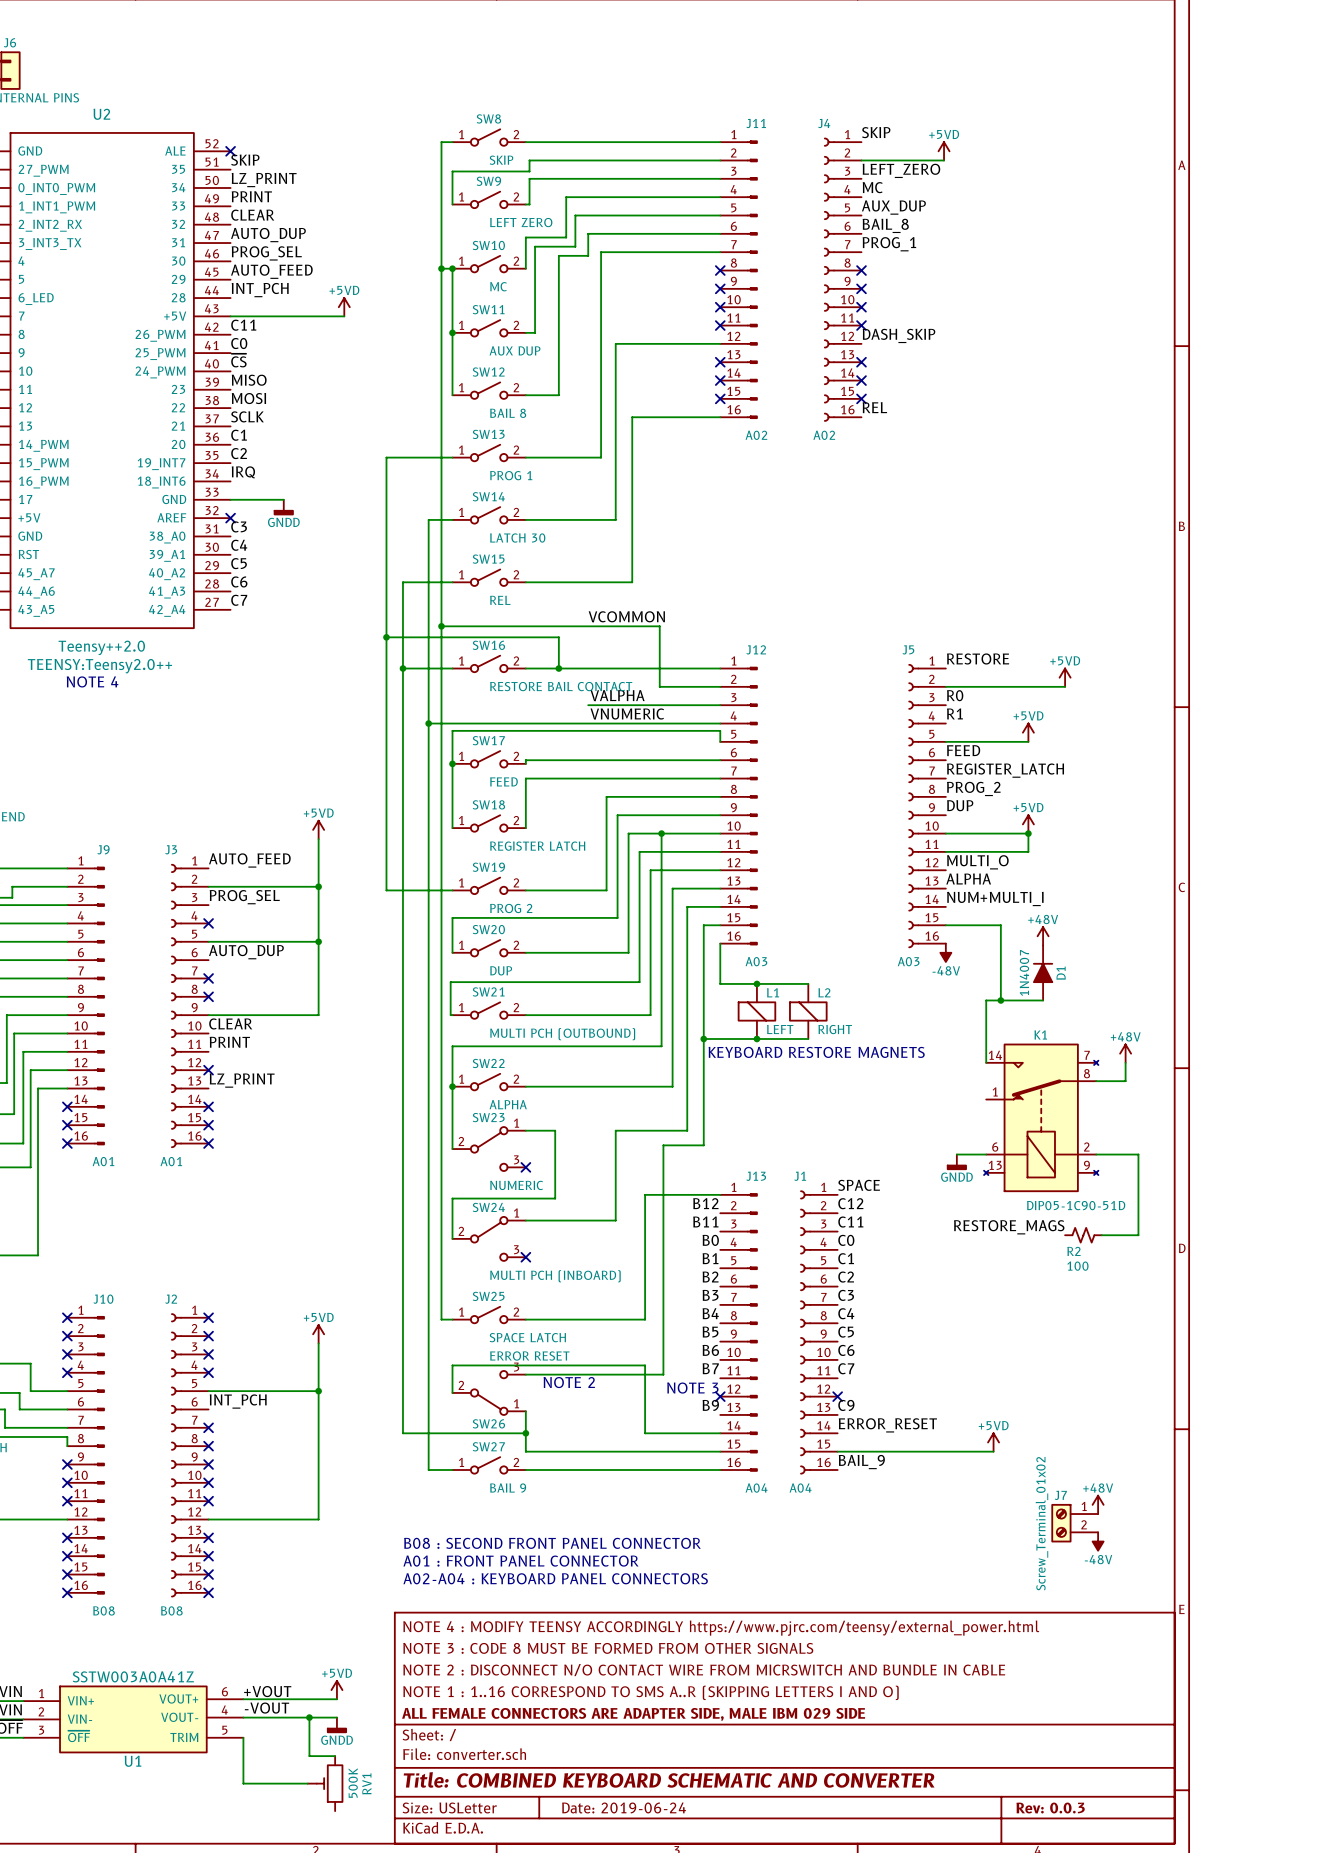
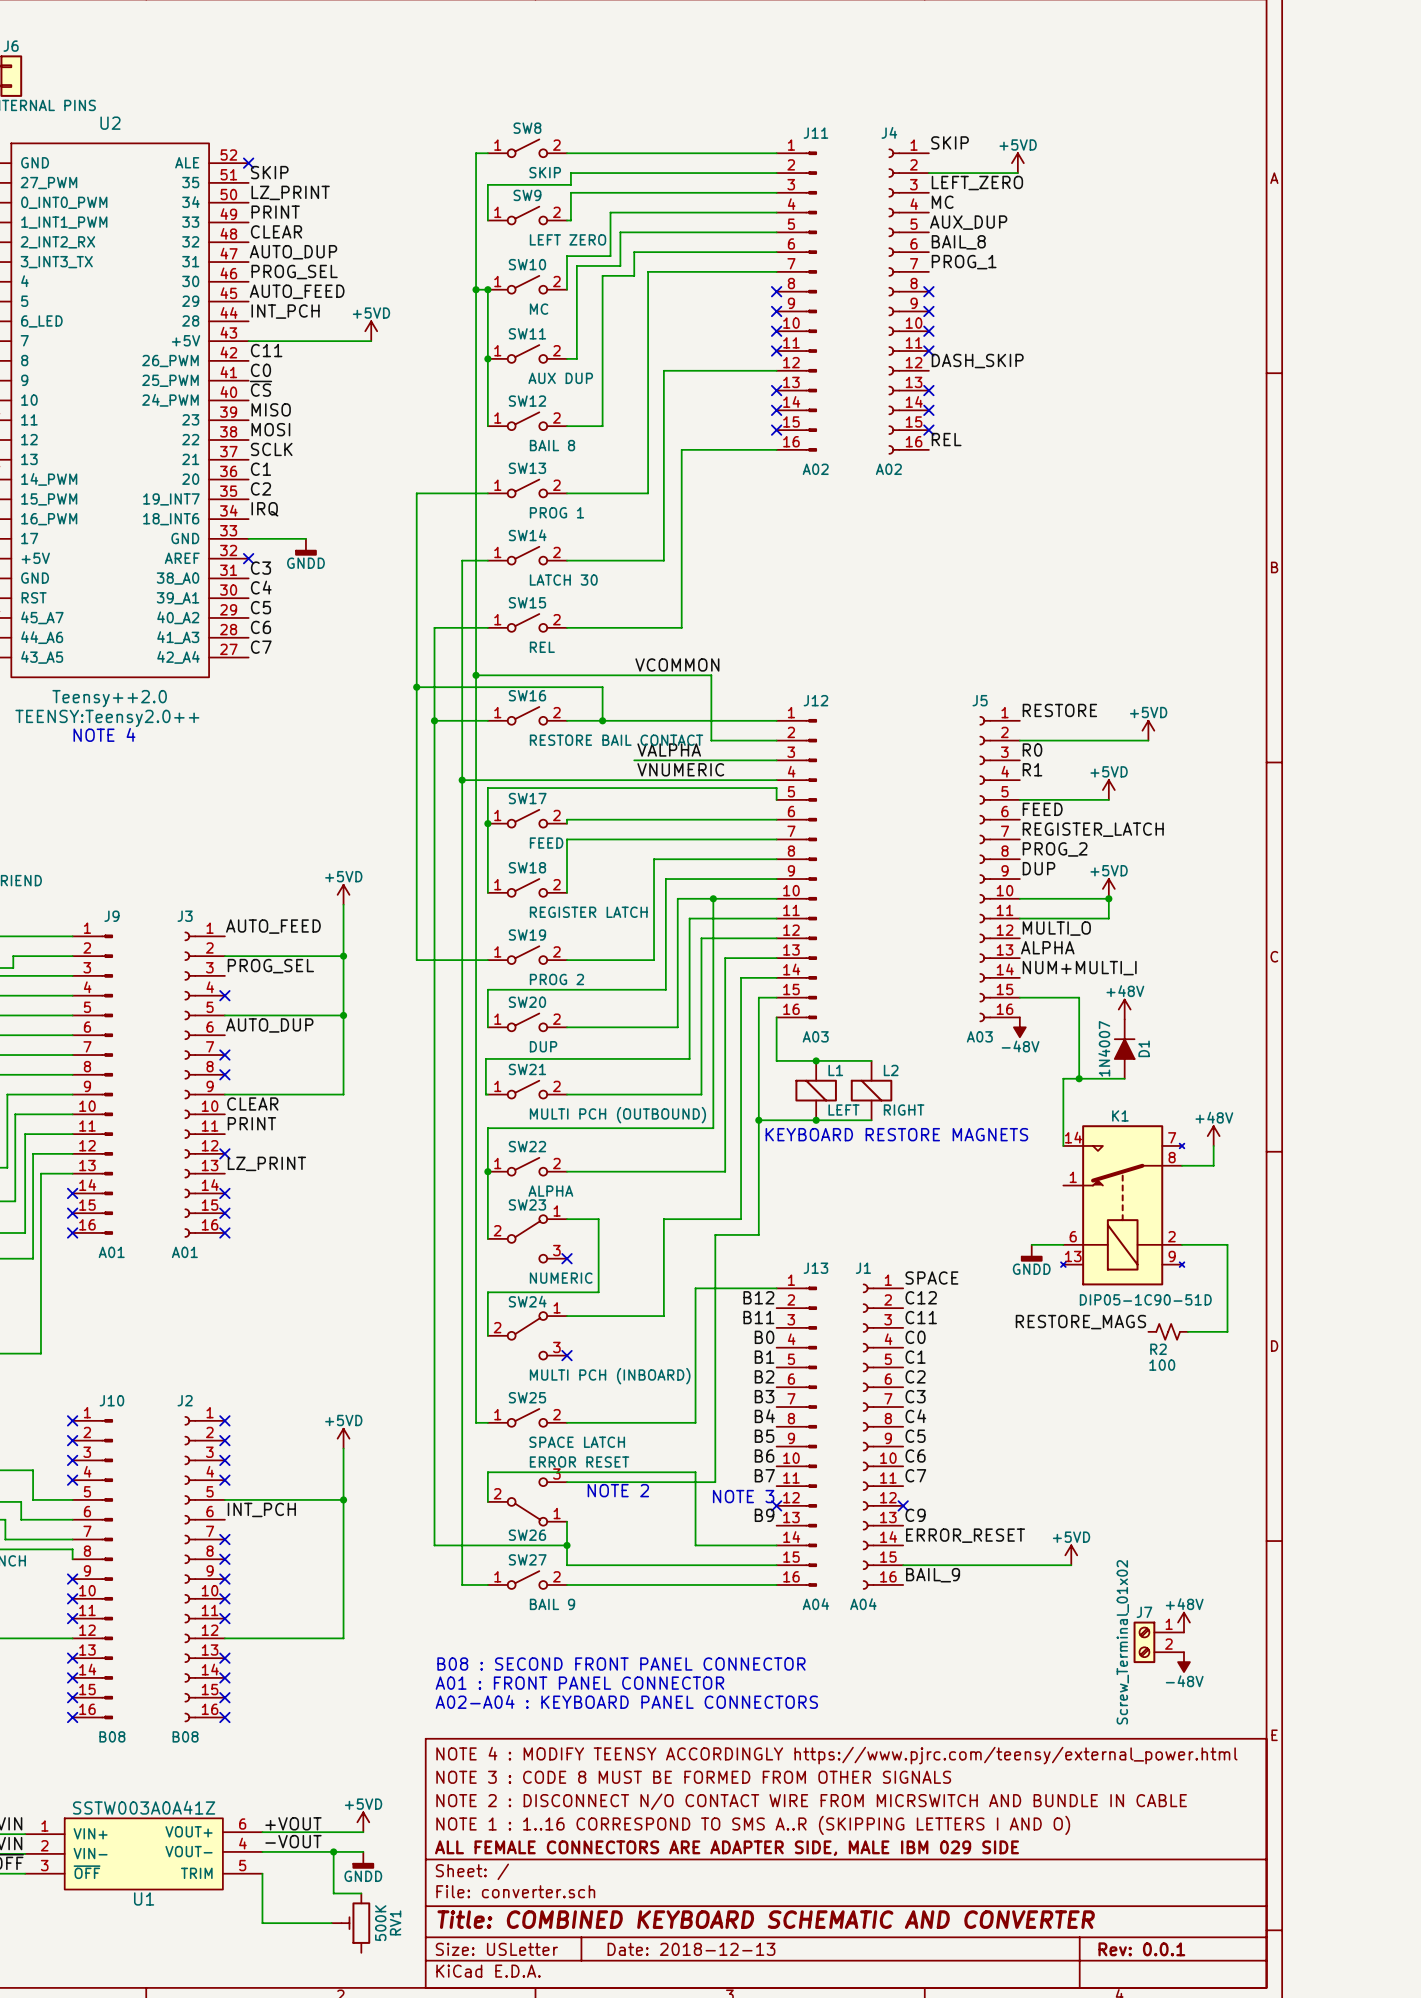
title block: Date: 2019-06-24 (624, 1807) -> Date: 2018-12-13 (691, 1949)
title block: Rev: 0.0.3 (1050, 1808) -> Rev: 0.0.1 (1141, 1949)

